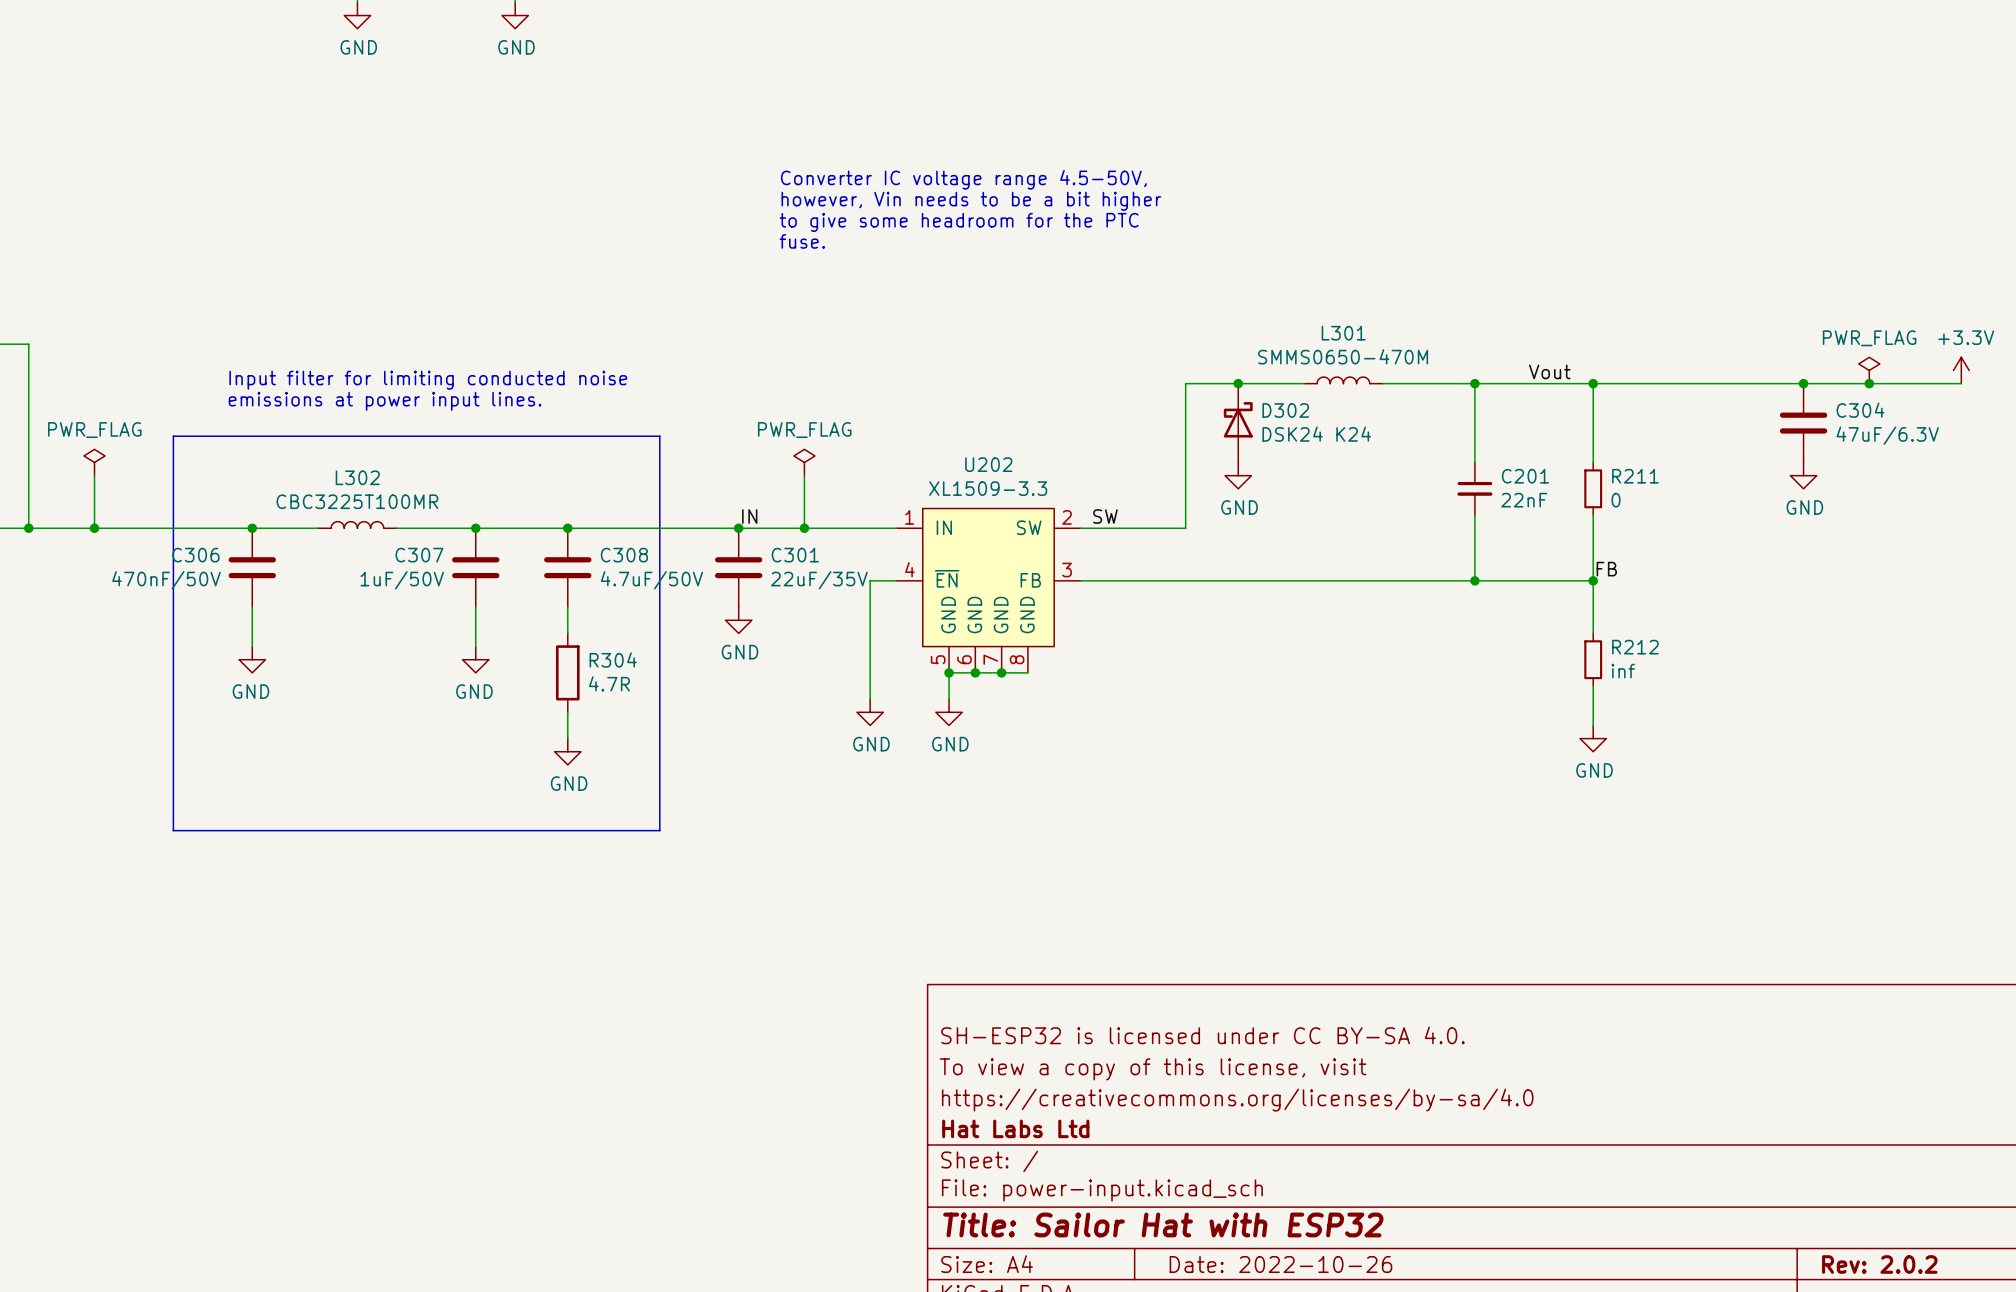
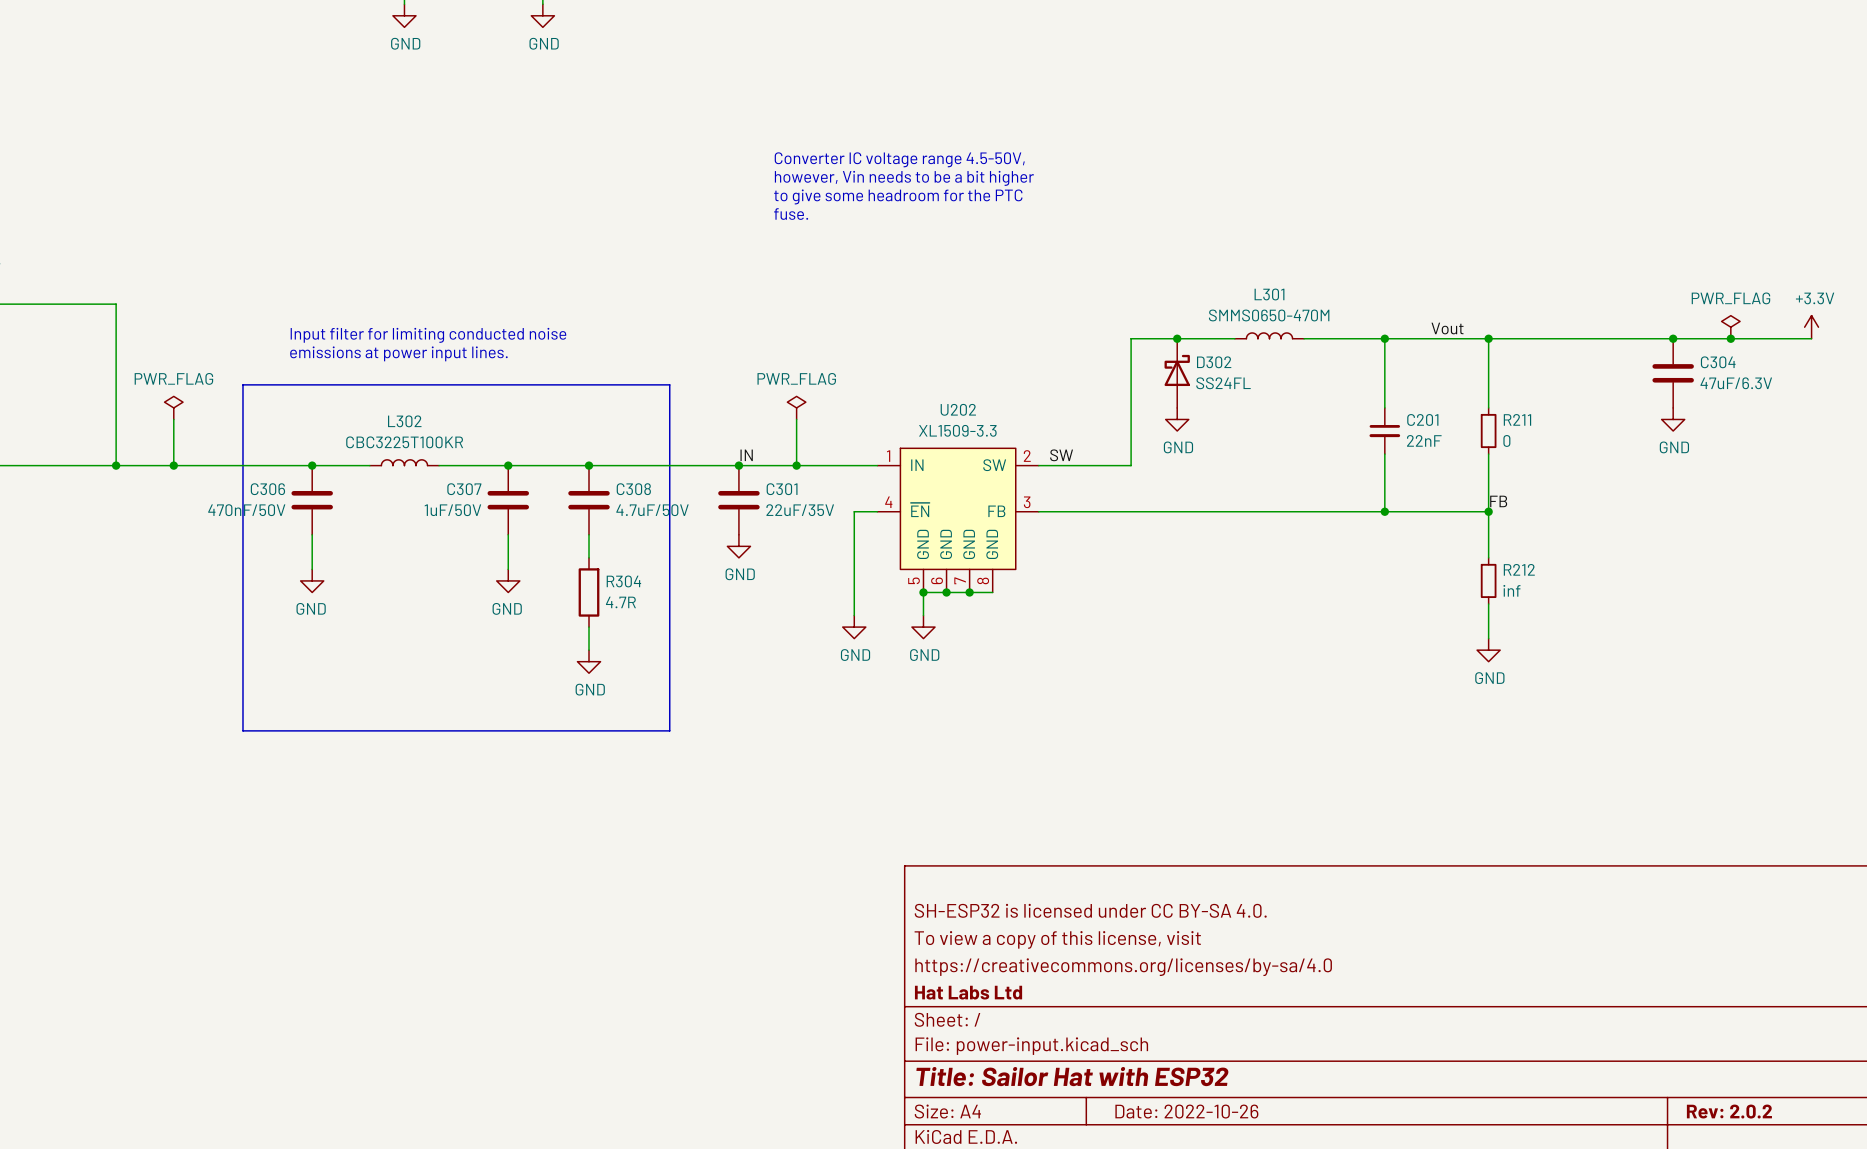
D302 value: DSK24 K24 (1316, 434) -> SS24FL (1223, 383)
L302 value: CBC3225T100MR (357, 501) -> CBC3225T100KR (404, 442)

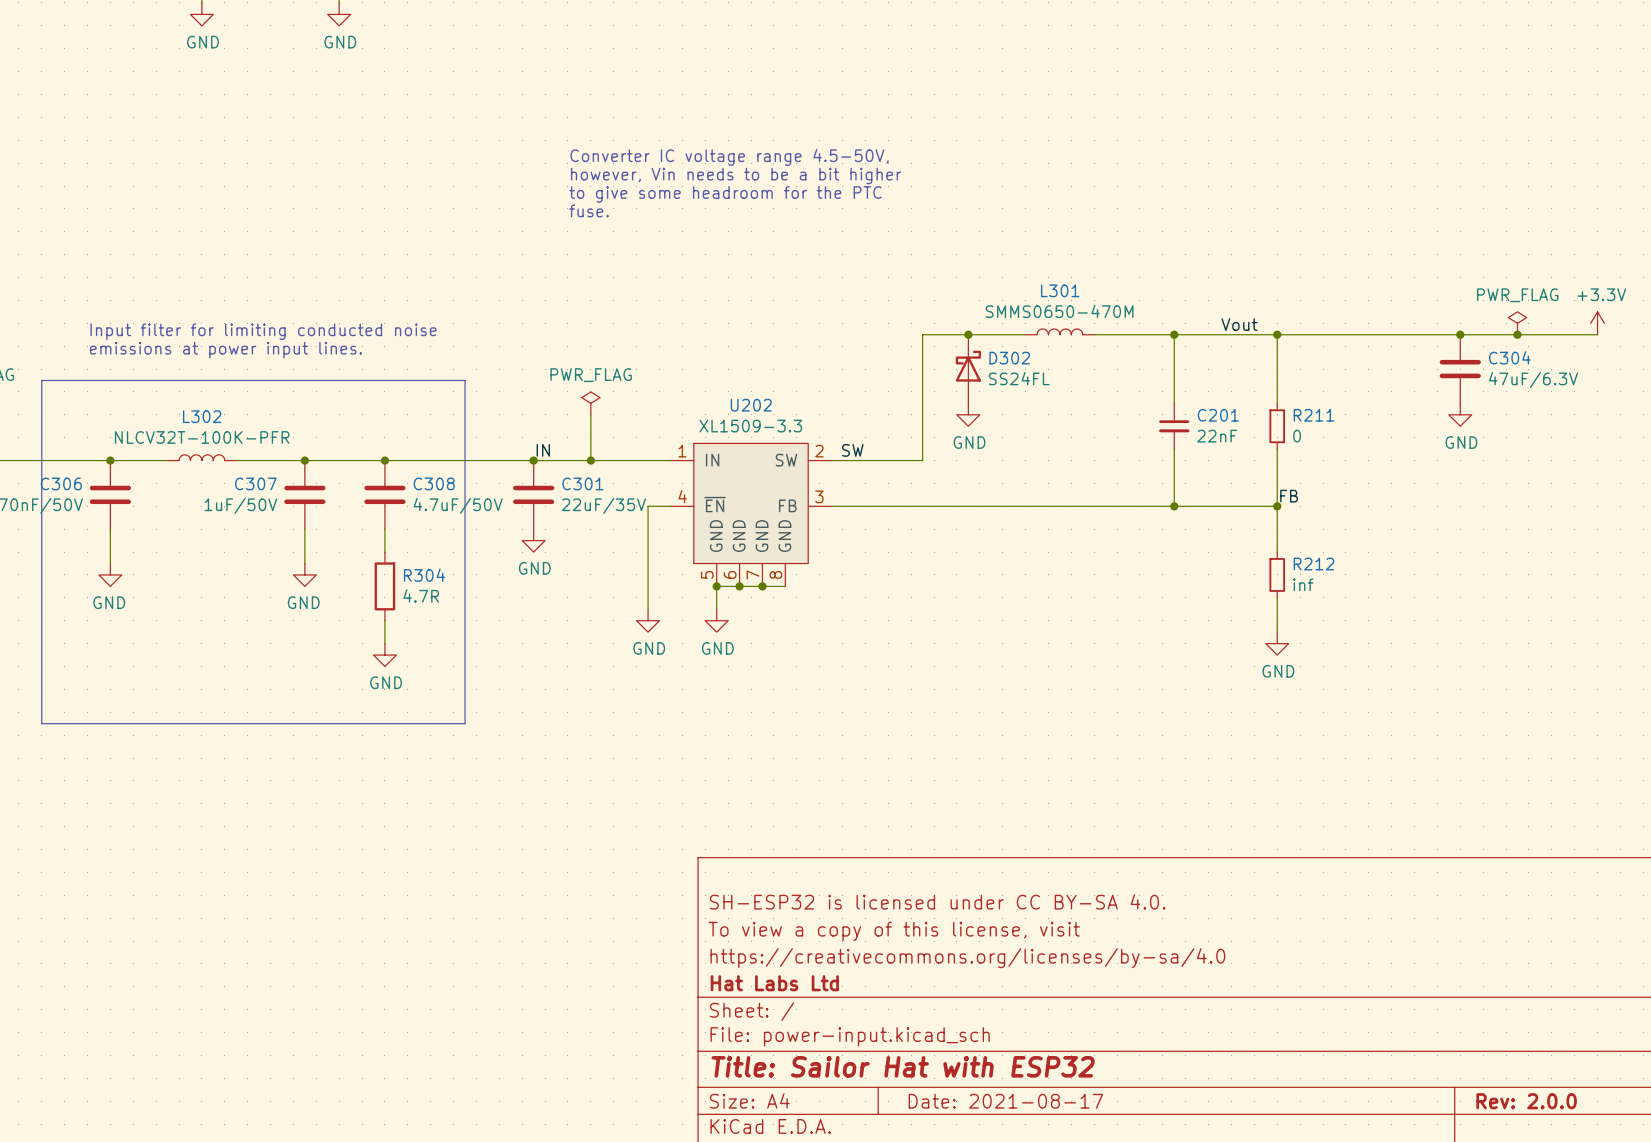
L302 value: CBC3225T100KR (404, 442) -> NLCV32T-100K-PFR (202, 437)
title block: Date: 2022-10-26 (1186, 1111) -> Date: 2021-08-17 (1005, 1101)
title block: Rev: 2.0.2 (1729, 1111) -> Rev: 2.0.0 (1526, 1101)

